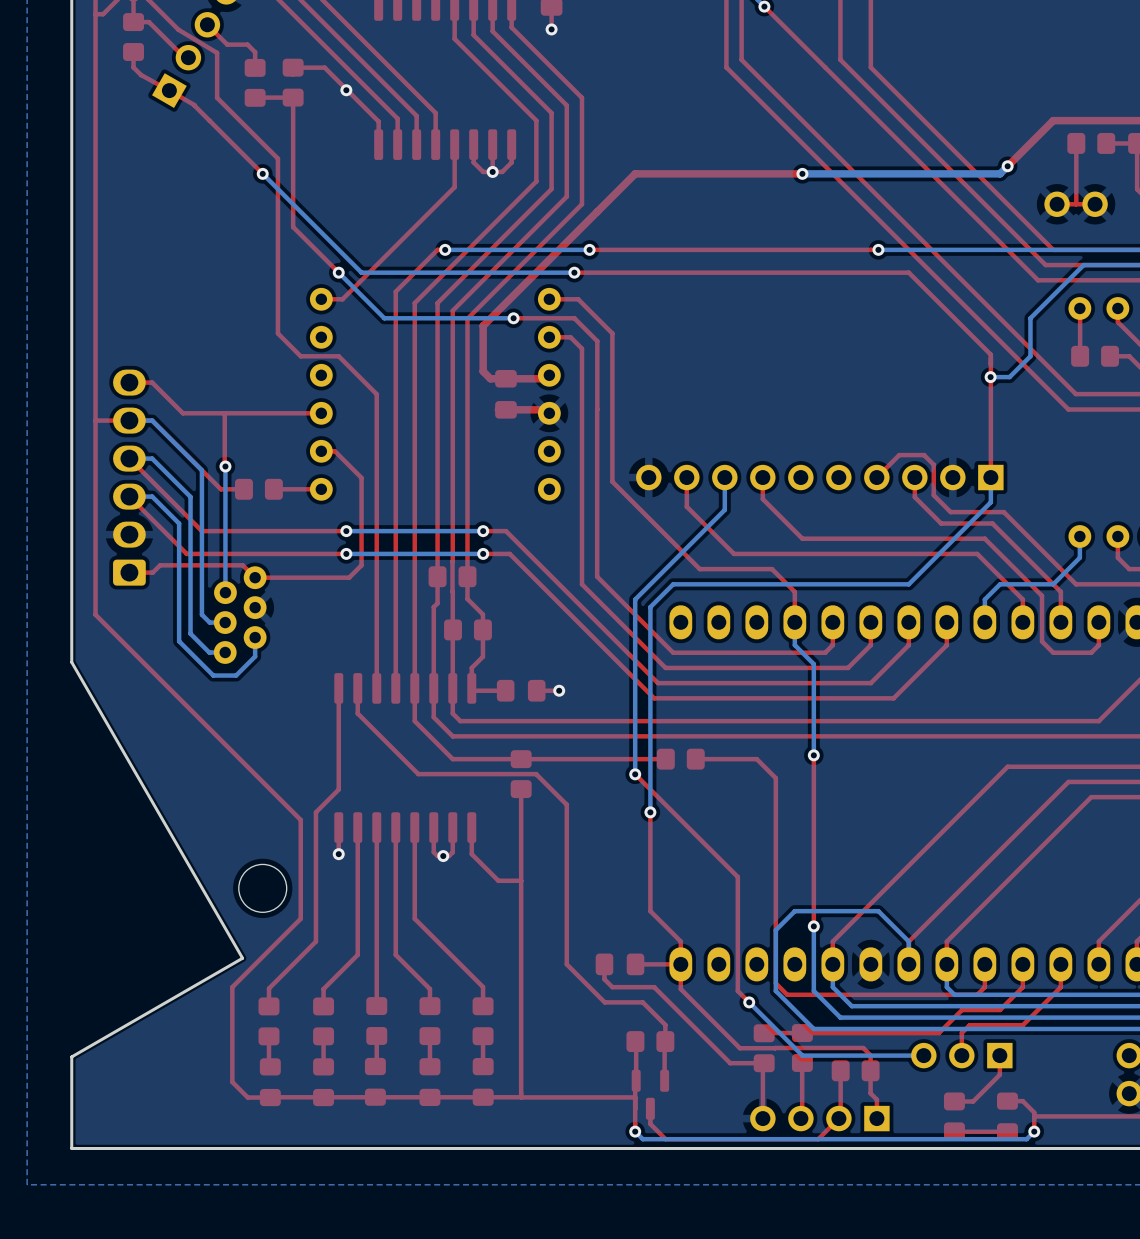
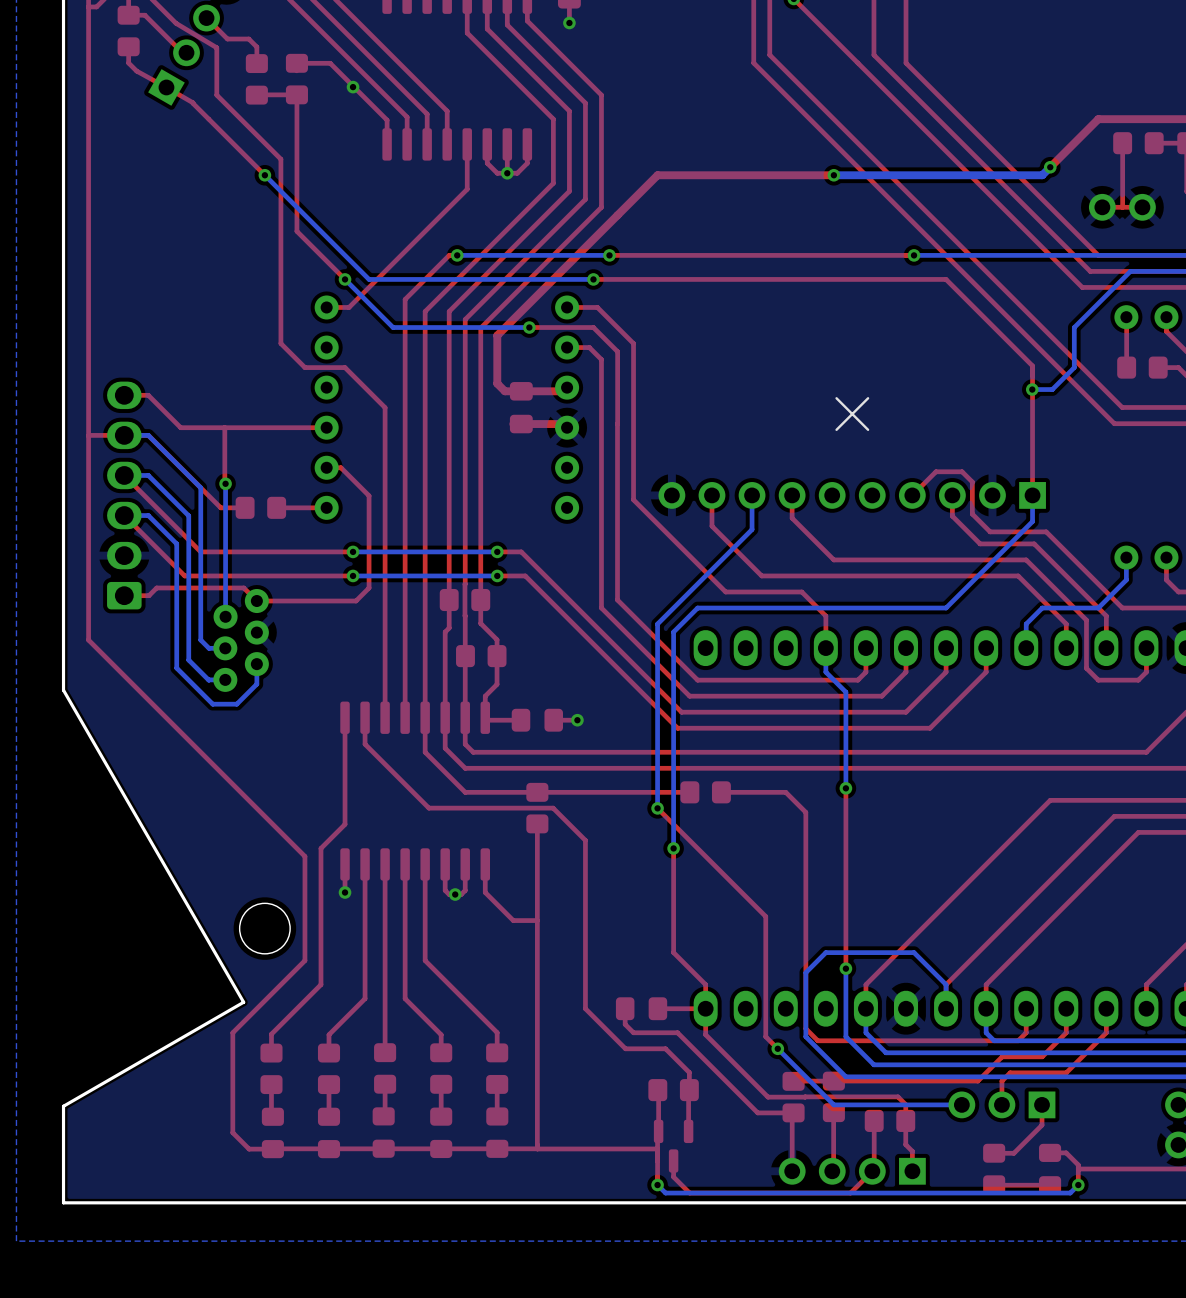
line: none -> (836, 398) (868, 429)
line: none -> (868, 398) (836, 429)

